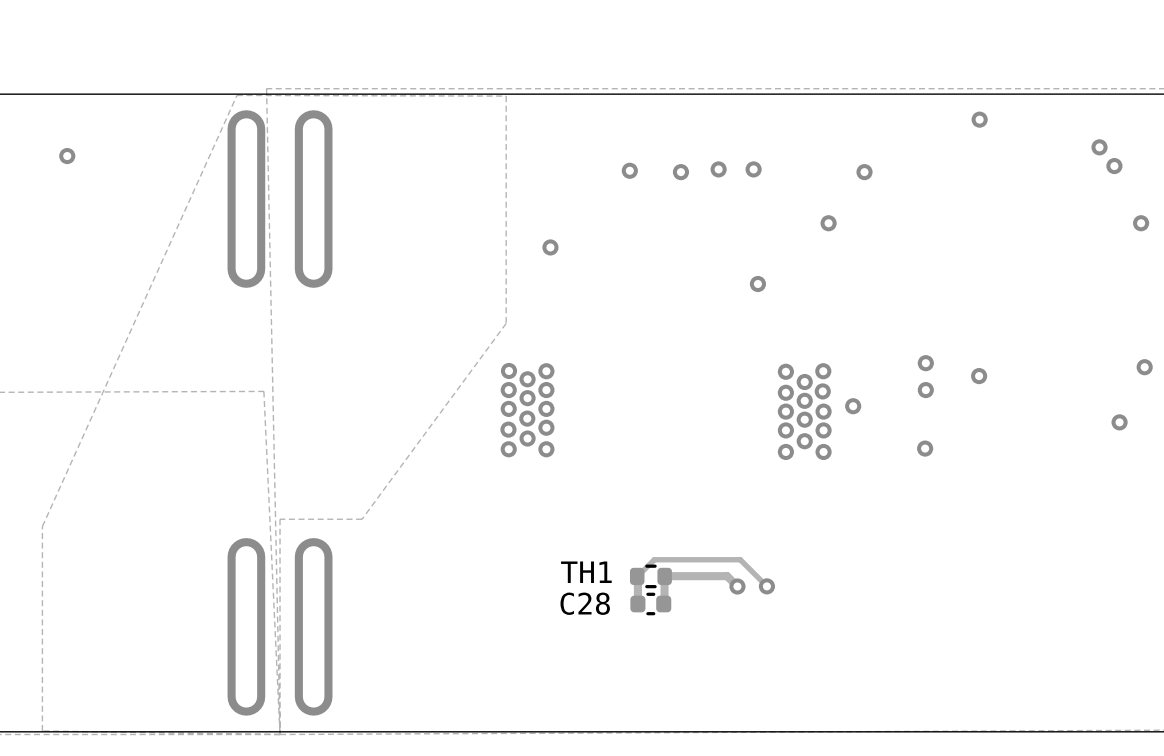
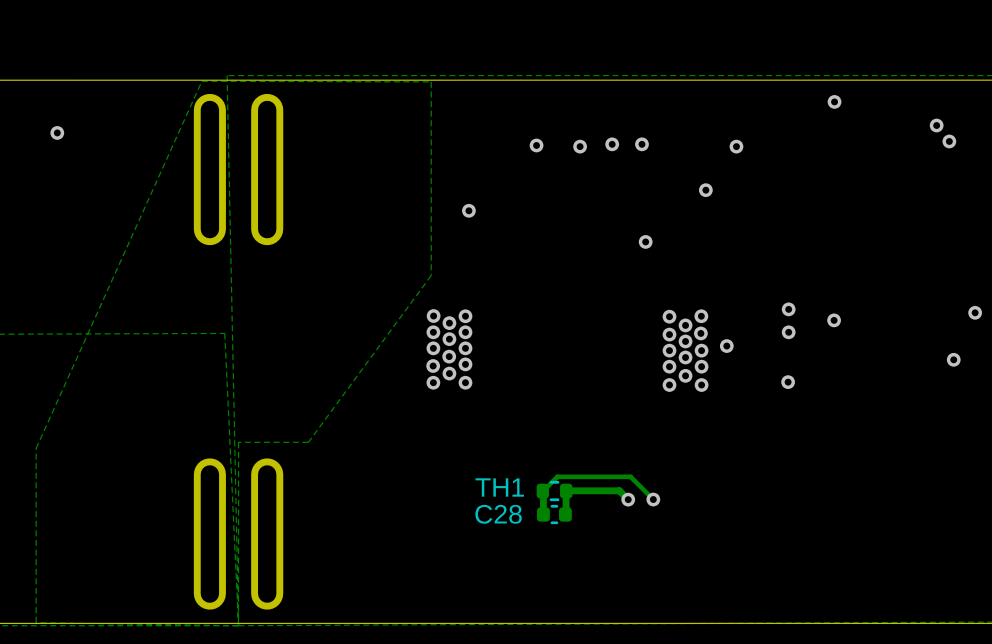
via: (1141, 223) -> none

